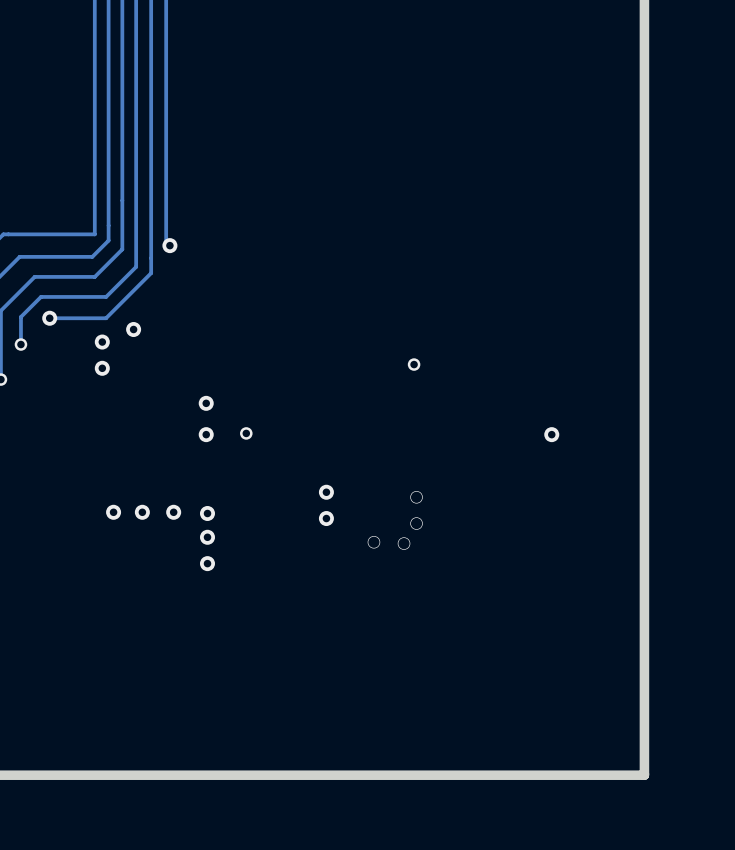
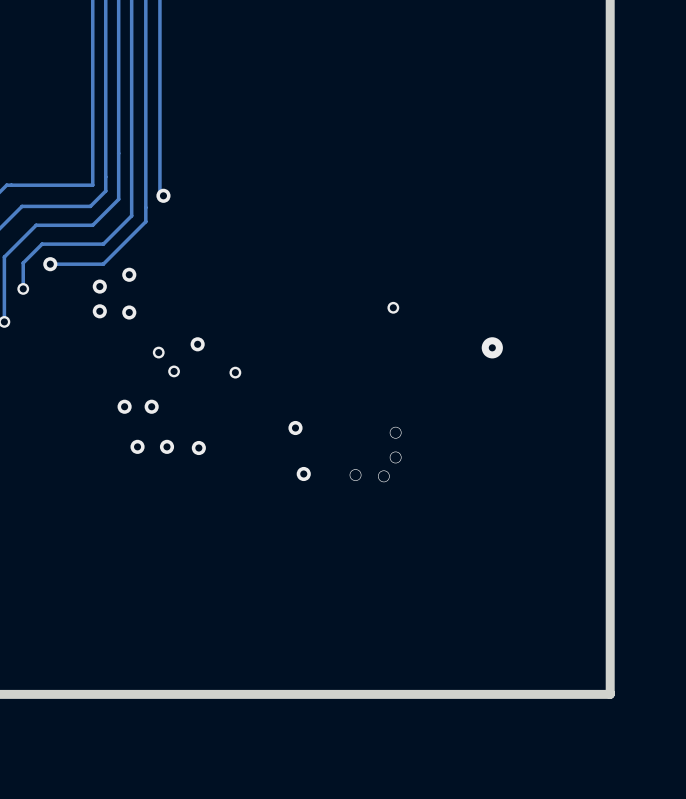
via: none -> (129, 312)
via: none -> (492, 347)
via: none -> (158, 352)
via: none -> (174, 371)
via: (206, 434) -> none
via: (551, 434) -> none
via: none -> (124, 406)
via: none -> (151, 406)
via: none -> (295, 428)
via: (326, 492) -> none
via: (113, 512) -> none
via: (326, 518) -> none
via: (207, 537) -> none
via: none -> (303, 473)
via: (207, 563) -> none

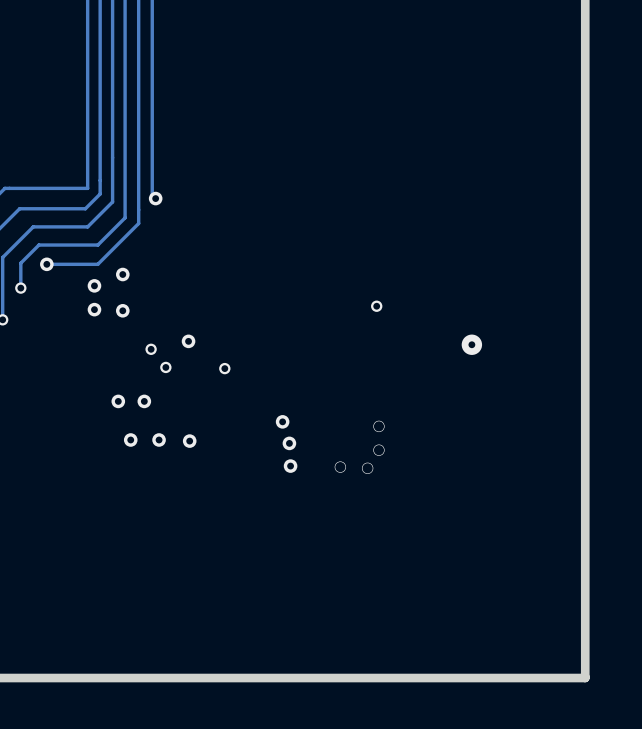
via: none -> (289, 443)

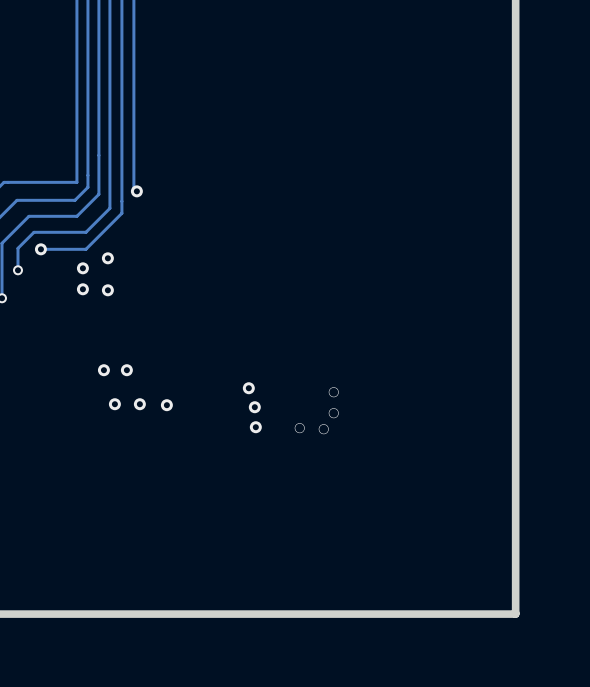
via: (376, 306) -> none
via: (188, 341) -> none
via: (471, 344) -> none
via: (151, 349) -> none
via: (165, 367) -> none
via: (224, 368) -> none

